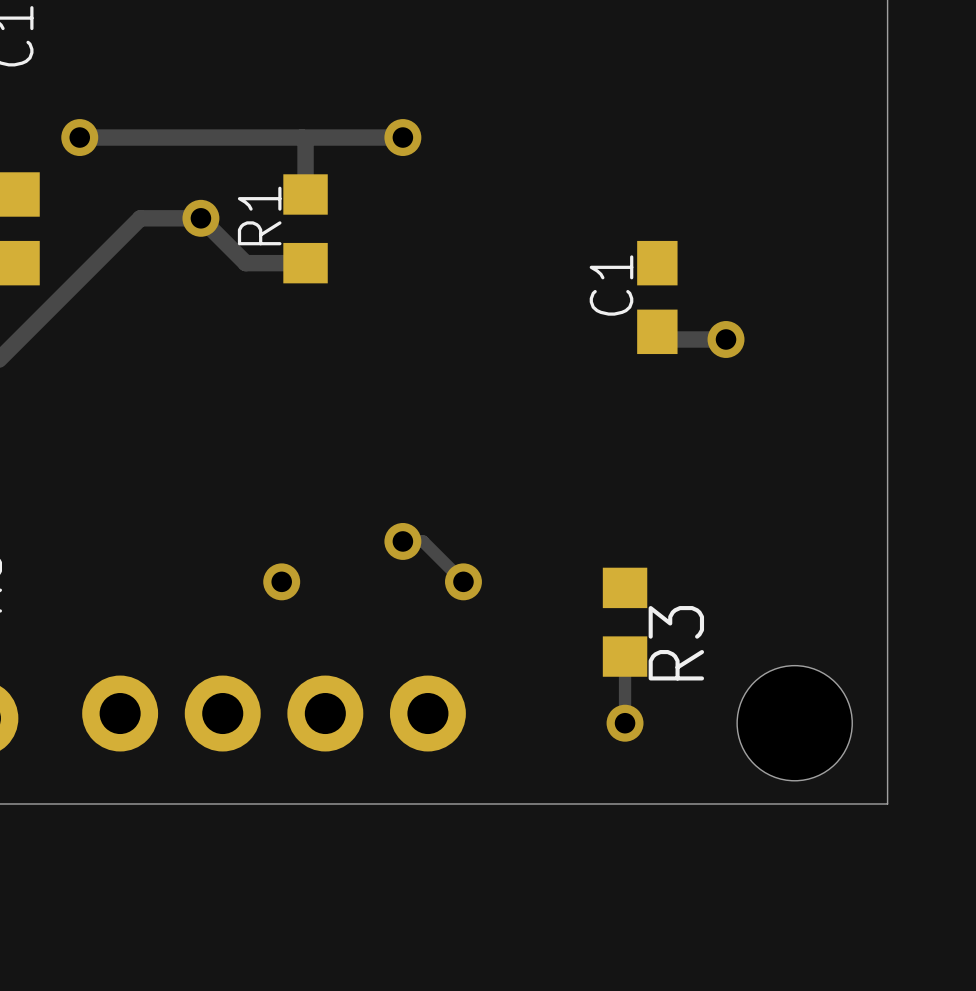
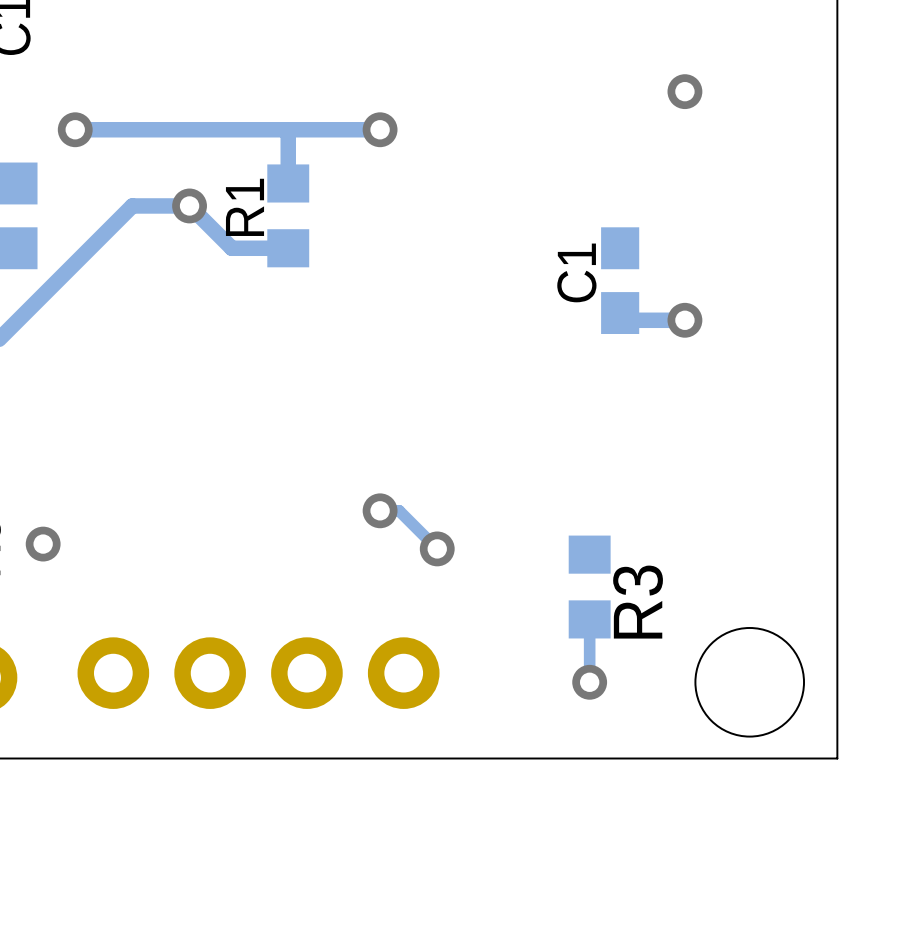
via: none -> (684, 91)
via position: (281, 581) -> (43, 544)

